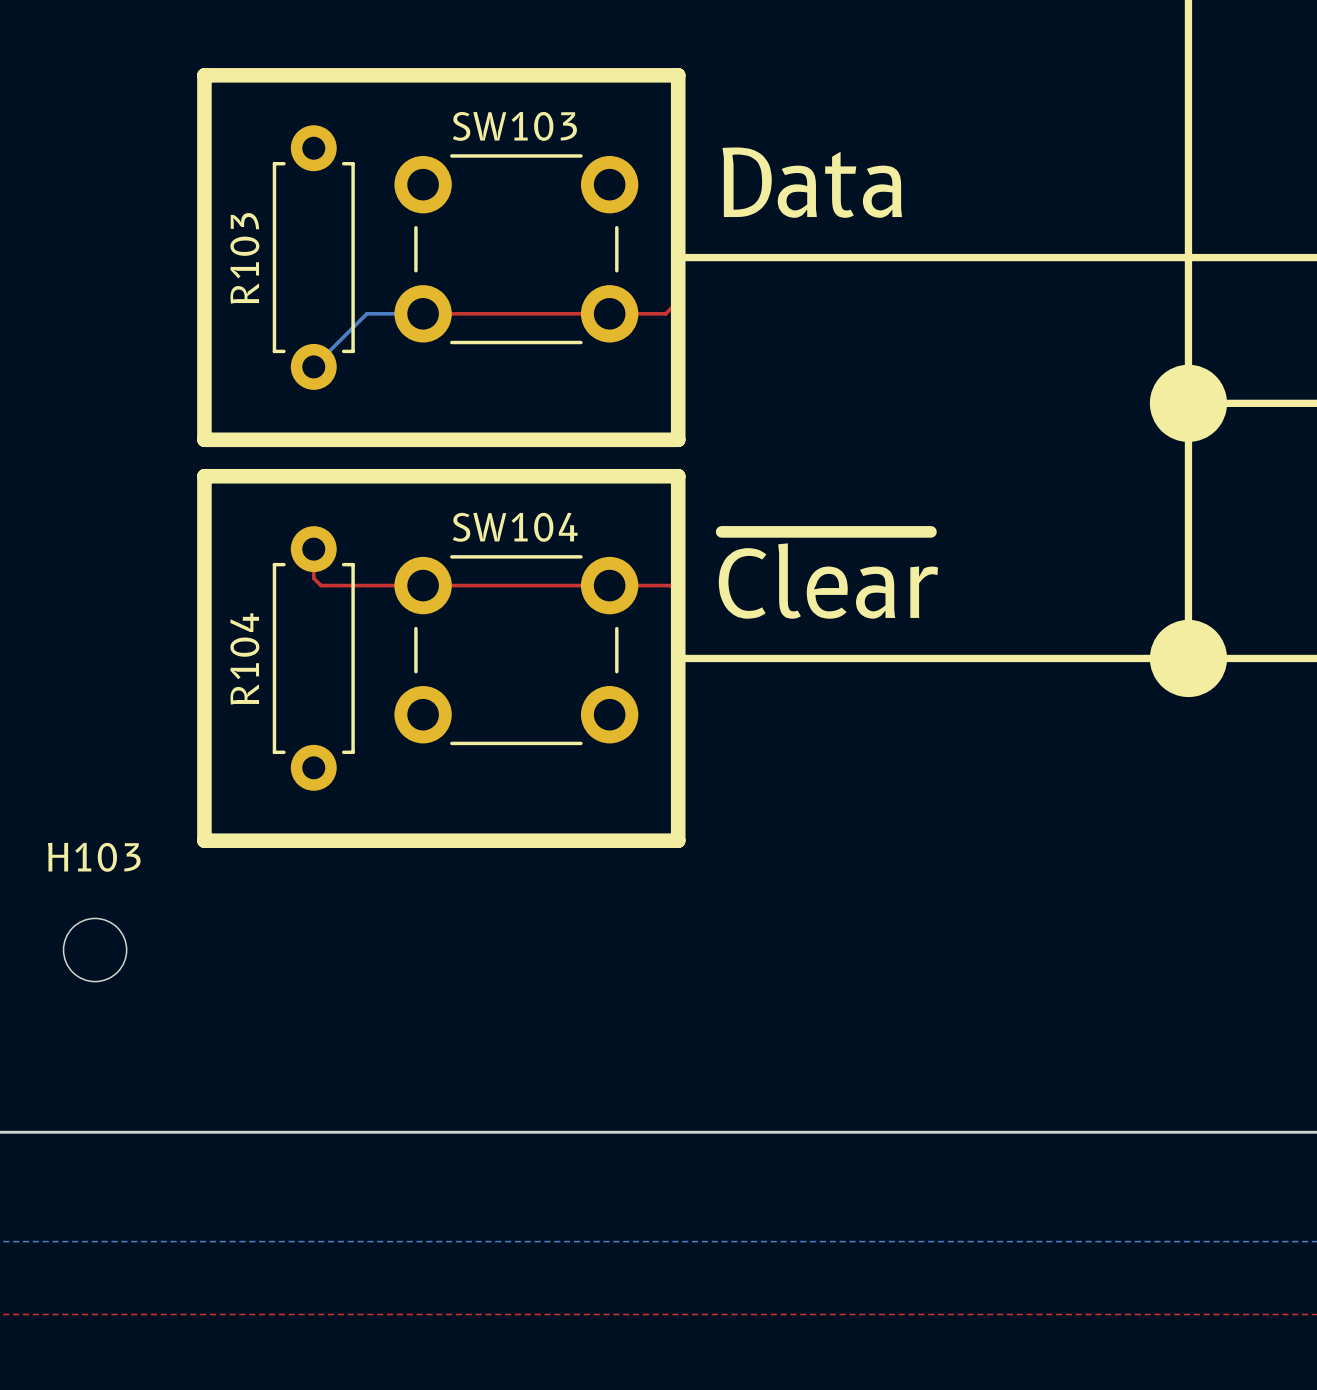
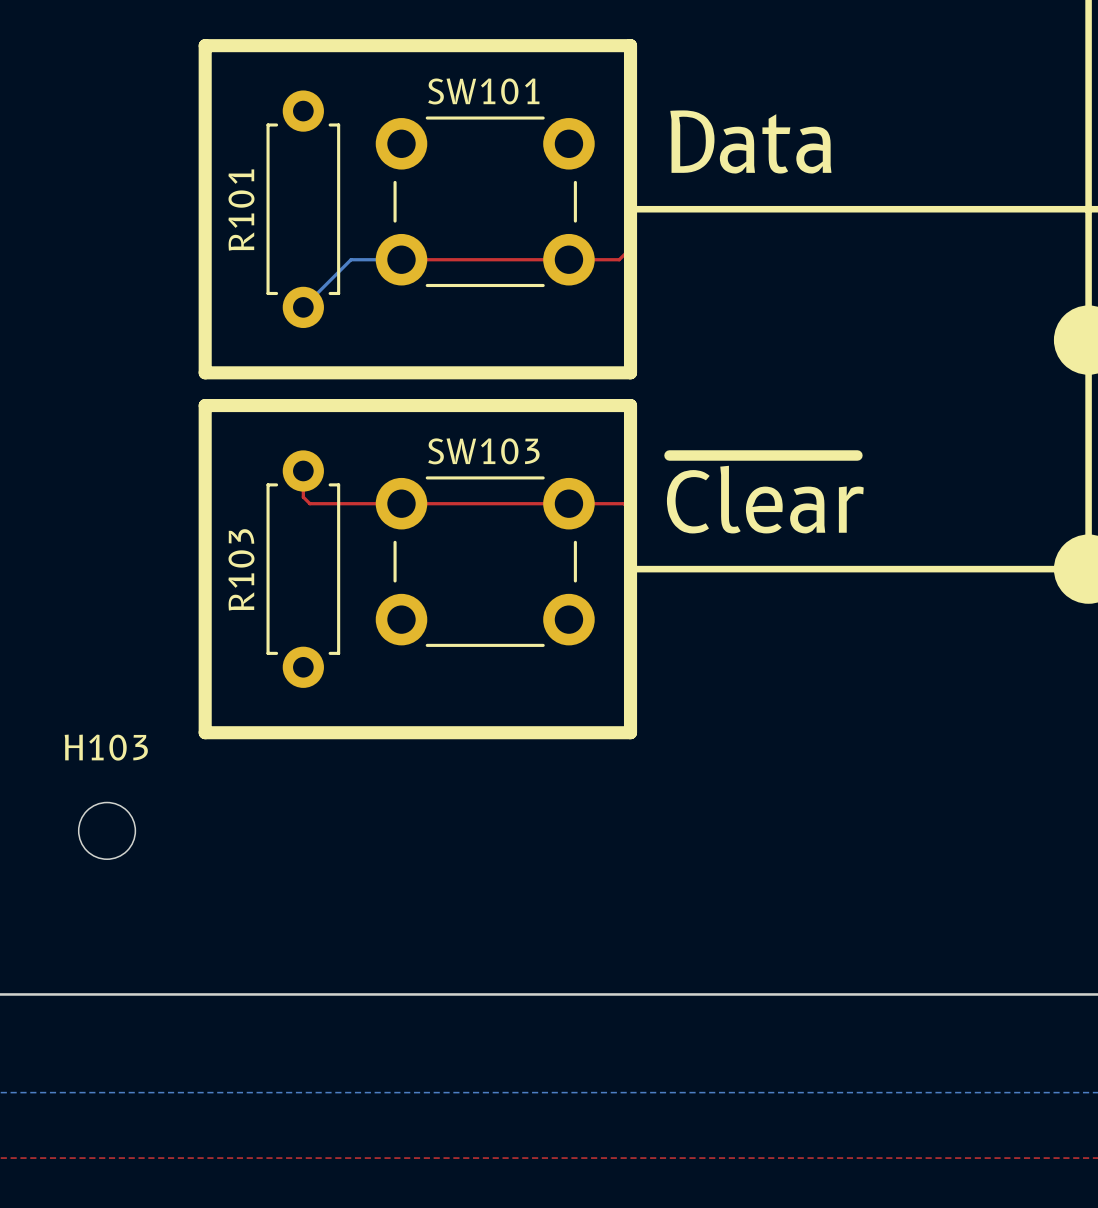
SW103 name: SW103 (514, 126) -> SW101 (483, 91)
R103 name: R103 (244, 258) -> R101 (241, 210)
SW104 name: SW104 (515, 527) -> SW103 (483, 451)
R104 name: R104 (244, 658) -> R103 (241, 569)

